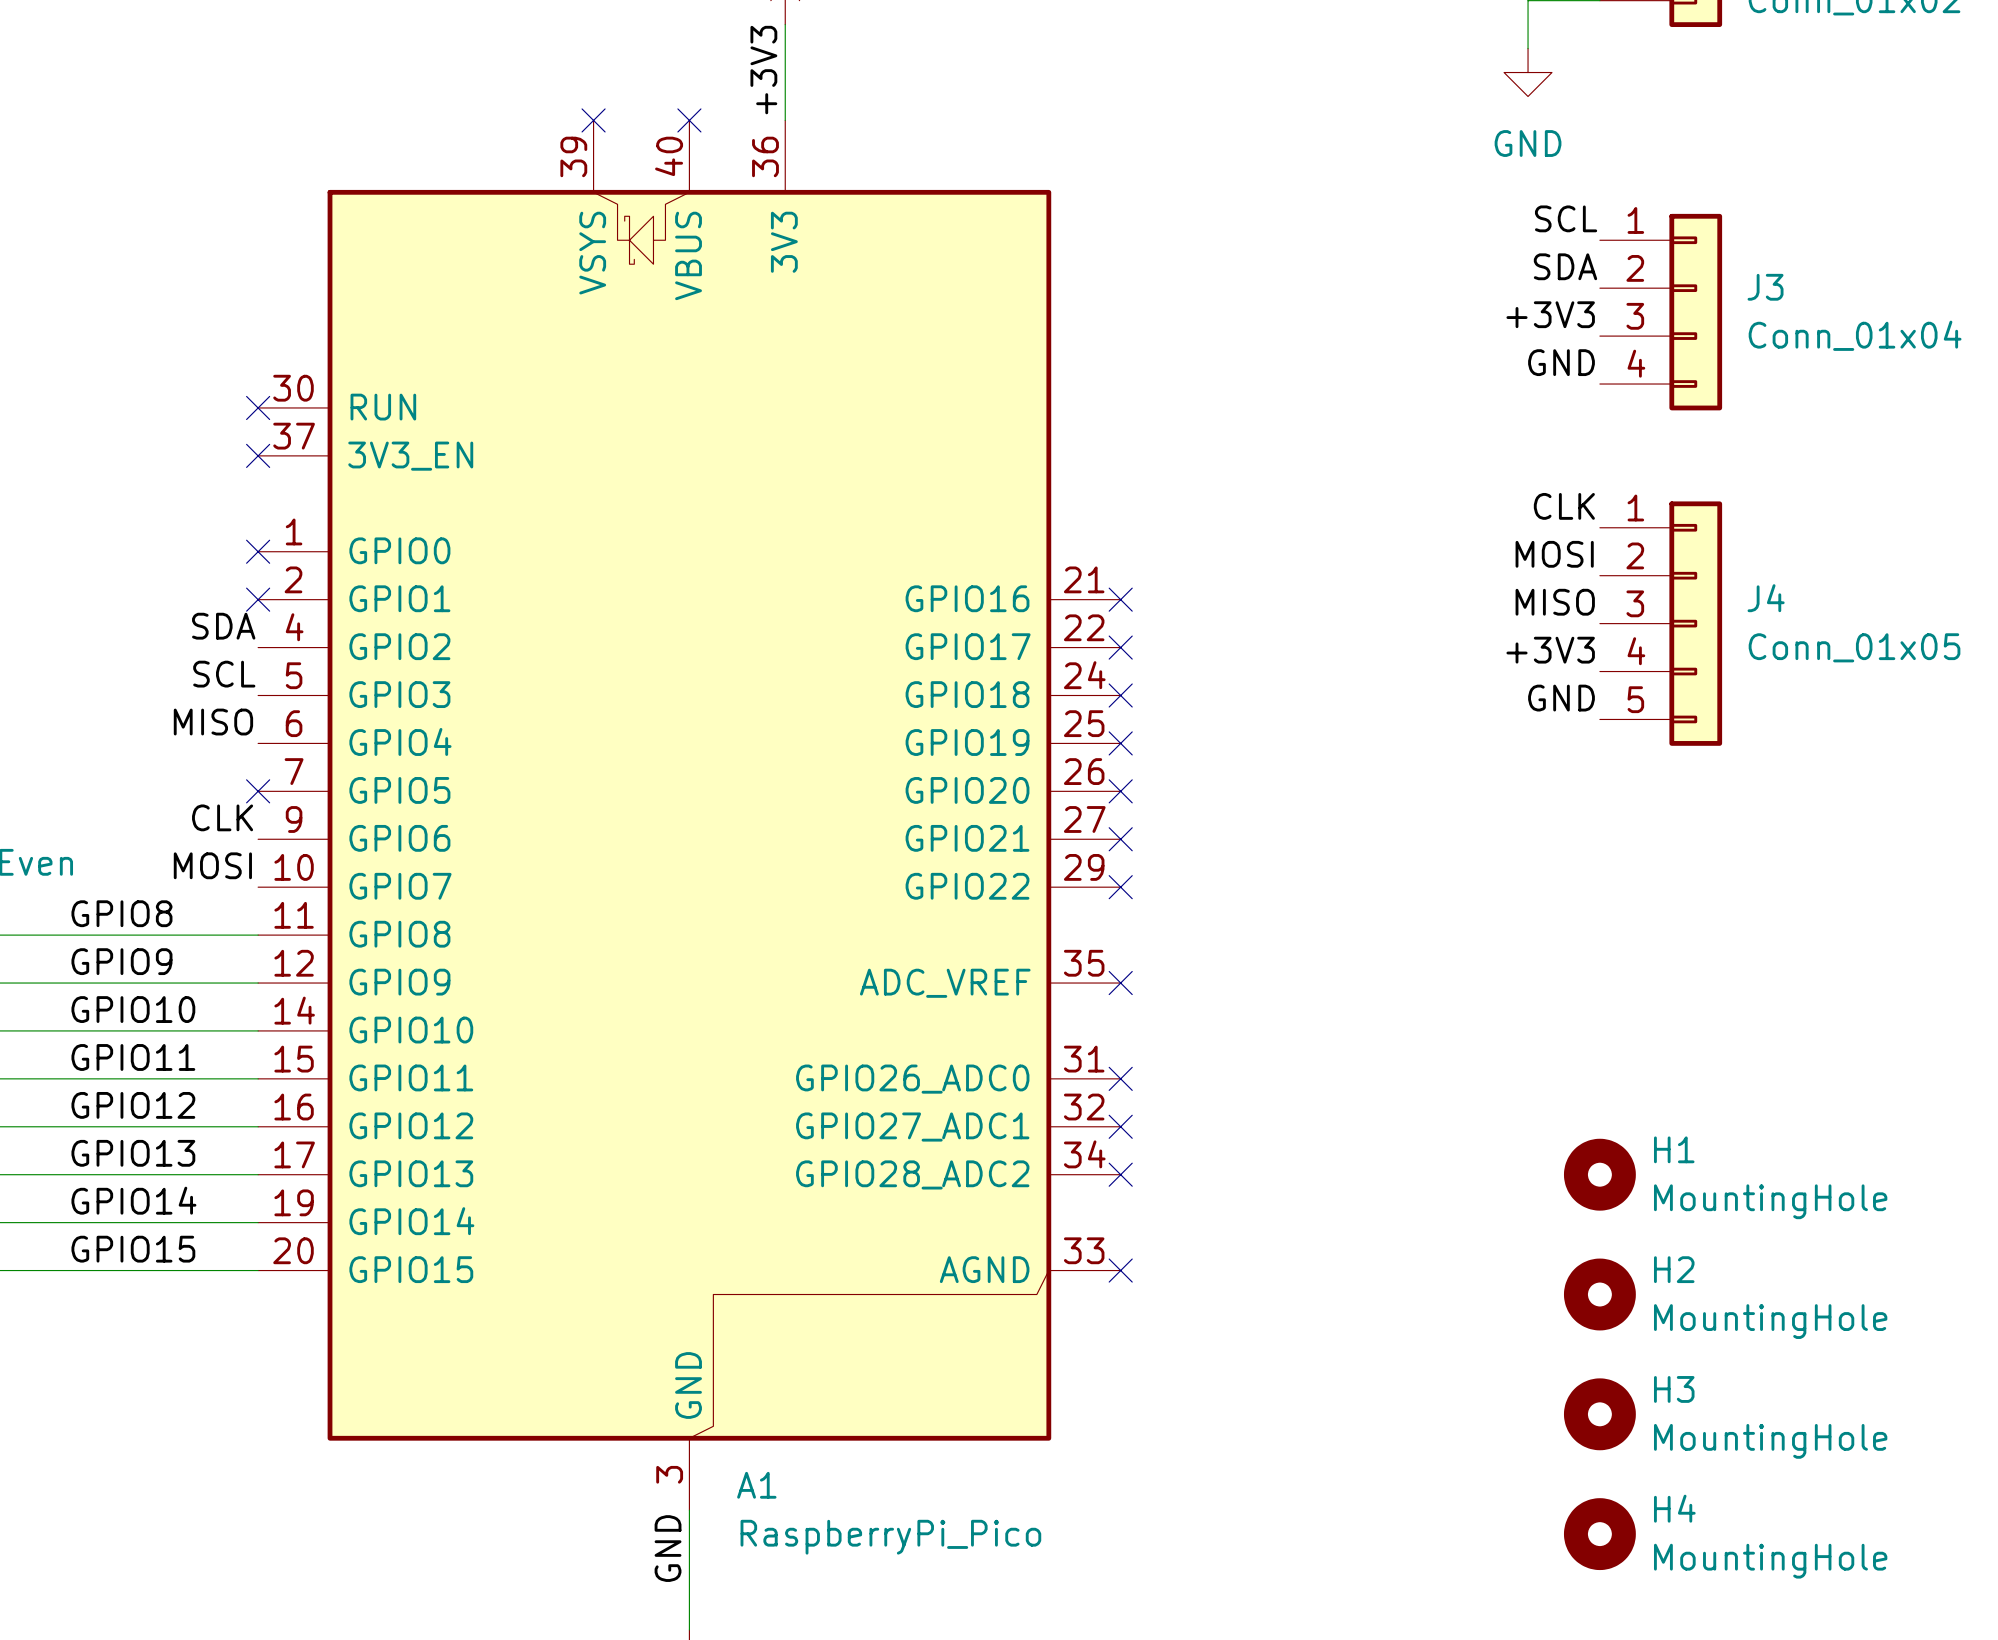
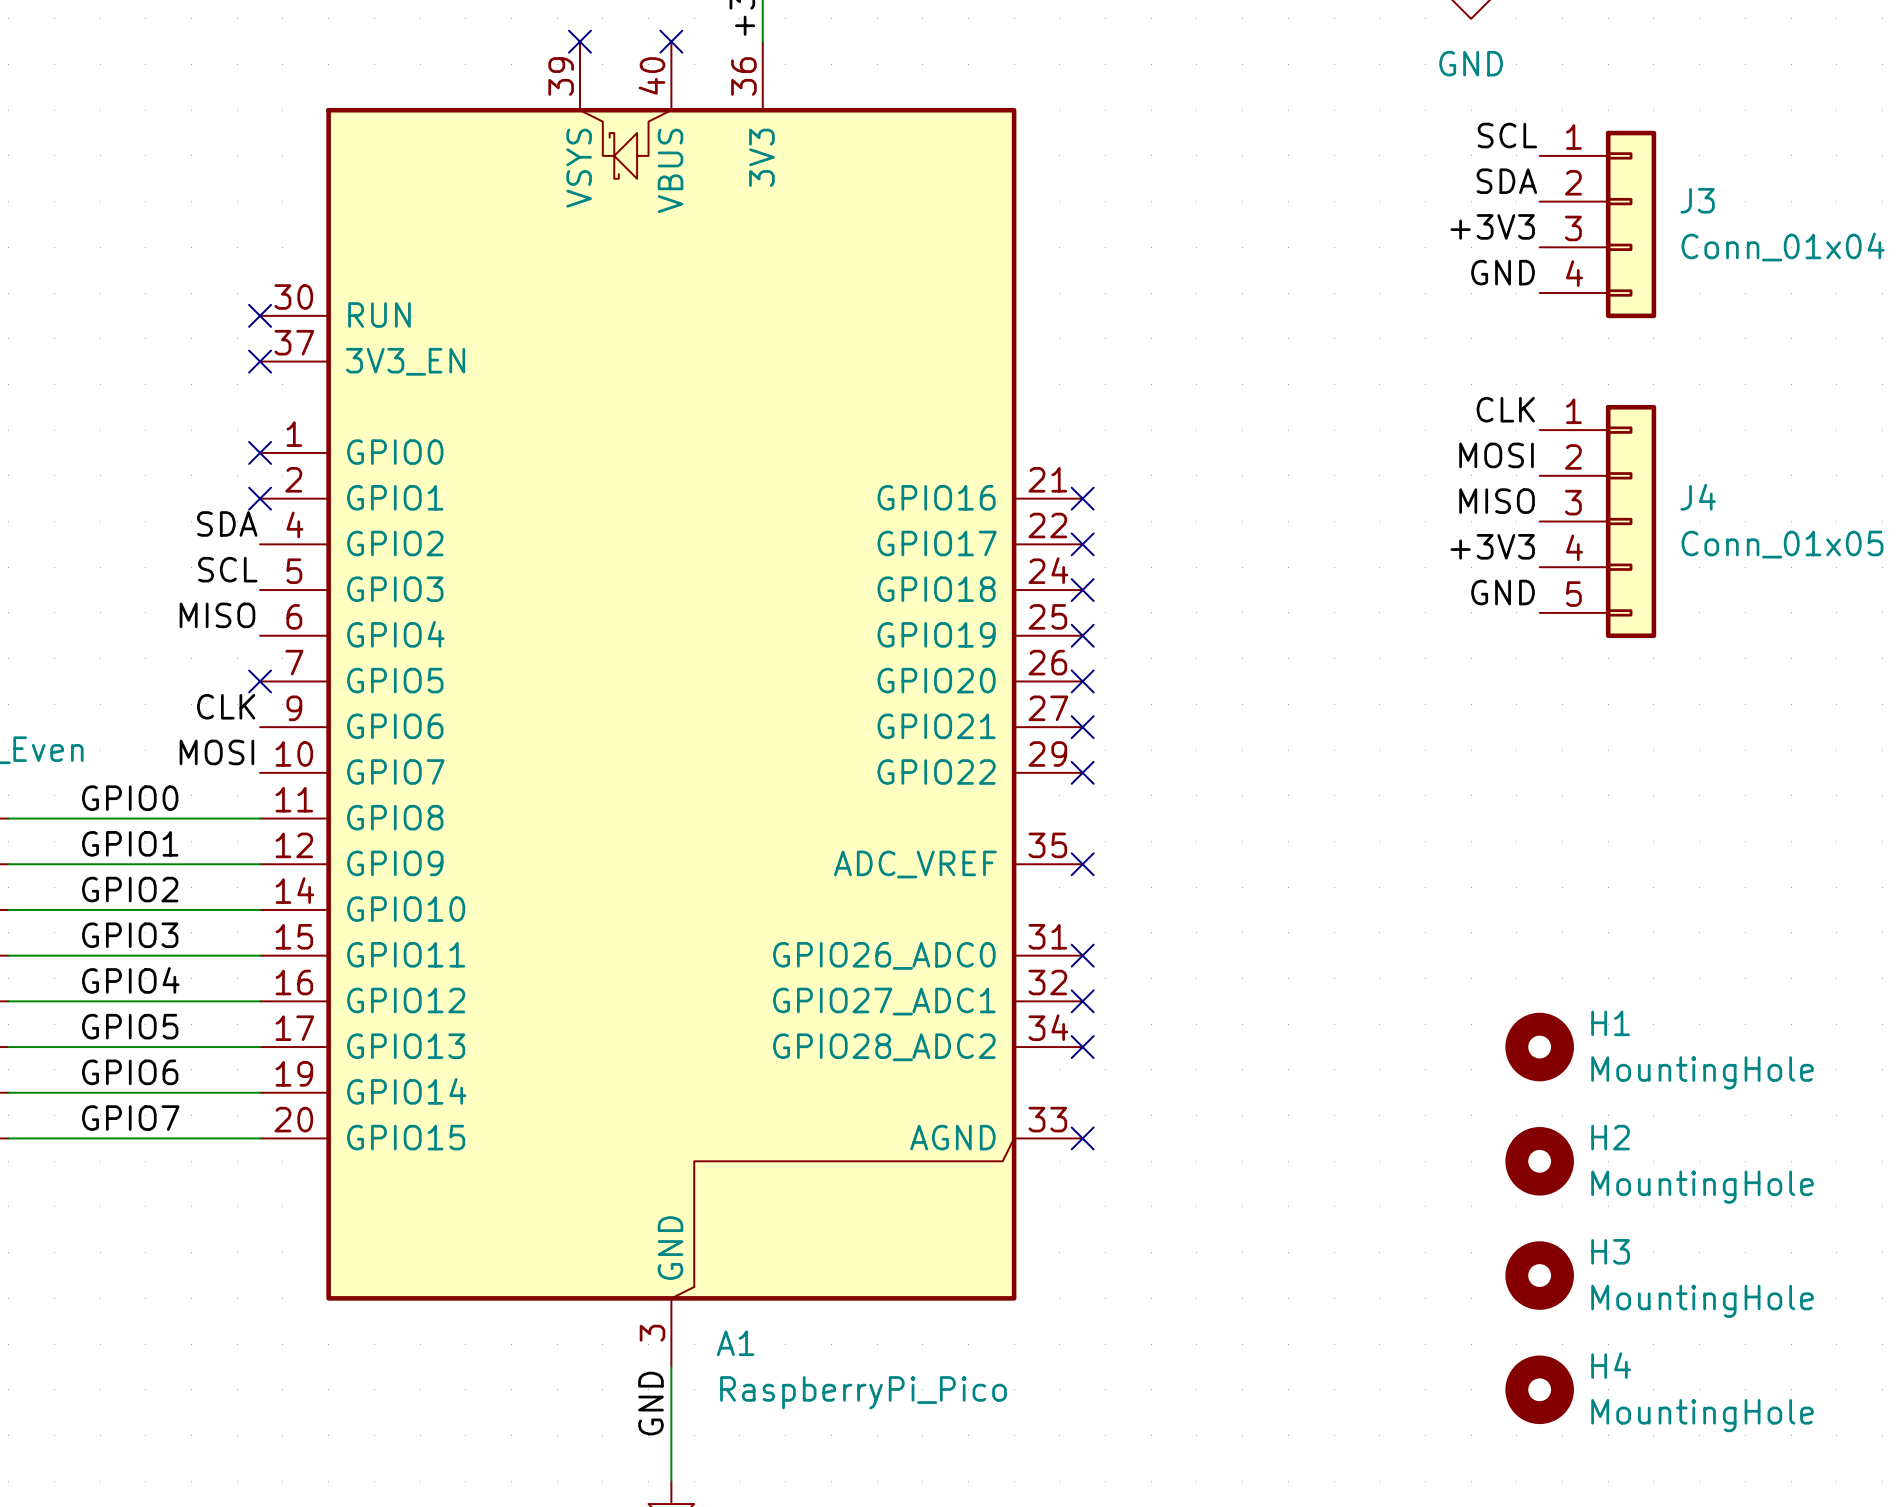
label: GPIO8 (121, 913) -> GPIO0 (130, 798)
label: GPIO9 (121, 961) -> GPIO1 (130, 843)
label: GPIO10 (133, 1009) -> GPIO2 (130, 889)
label: GPIO11 (133, 1057) -> GPIO3 (130, 935)
label: GPIO12 (133, 1105) -> GPIO4 (130, 980)
label: GPIO13 (133, 1153) -> GPIO5 (130, 1026)
label: GPIO14 (133, 1200) -> GPIO6 (130, 1072)
label: GPIO15 (133, 1249) -> GPIO7 (130, 1118)

